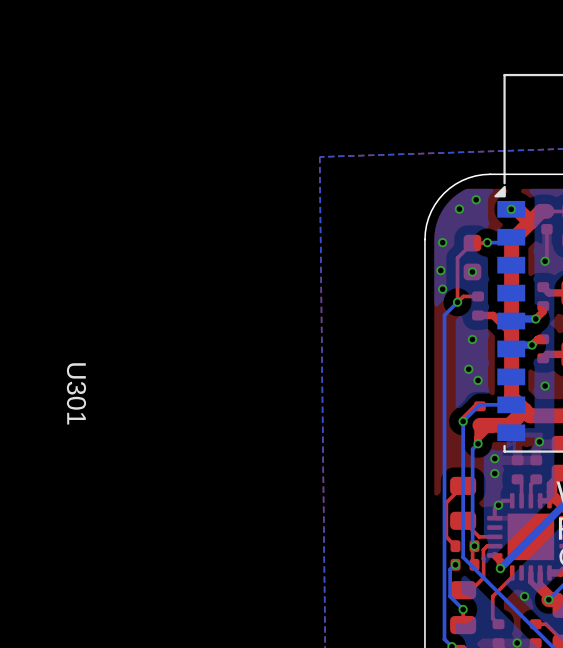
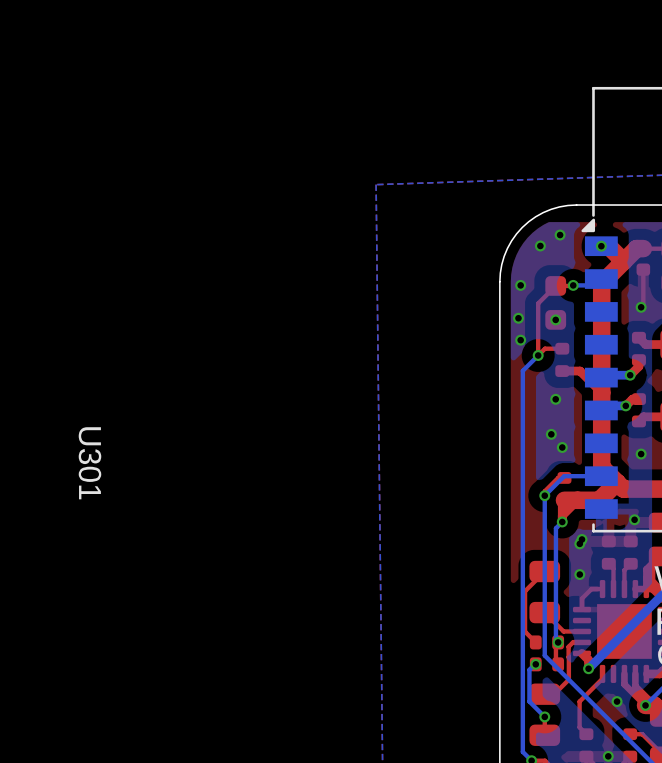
via: none -> (579, 543)
via: (494, 473) -> none
via: none -> (579, 574)
via: (498, 505) -> none

